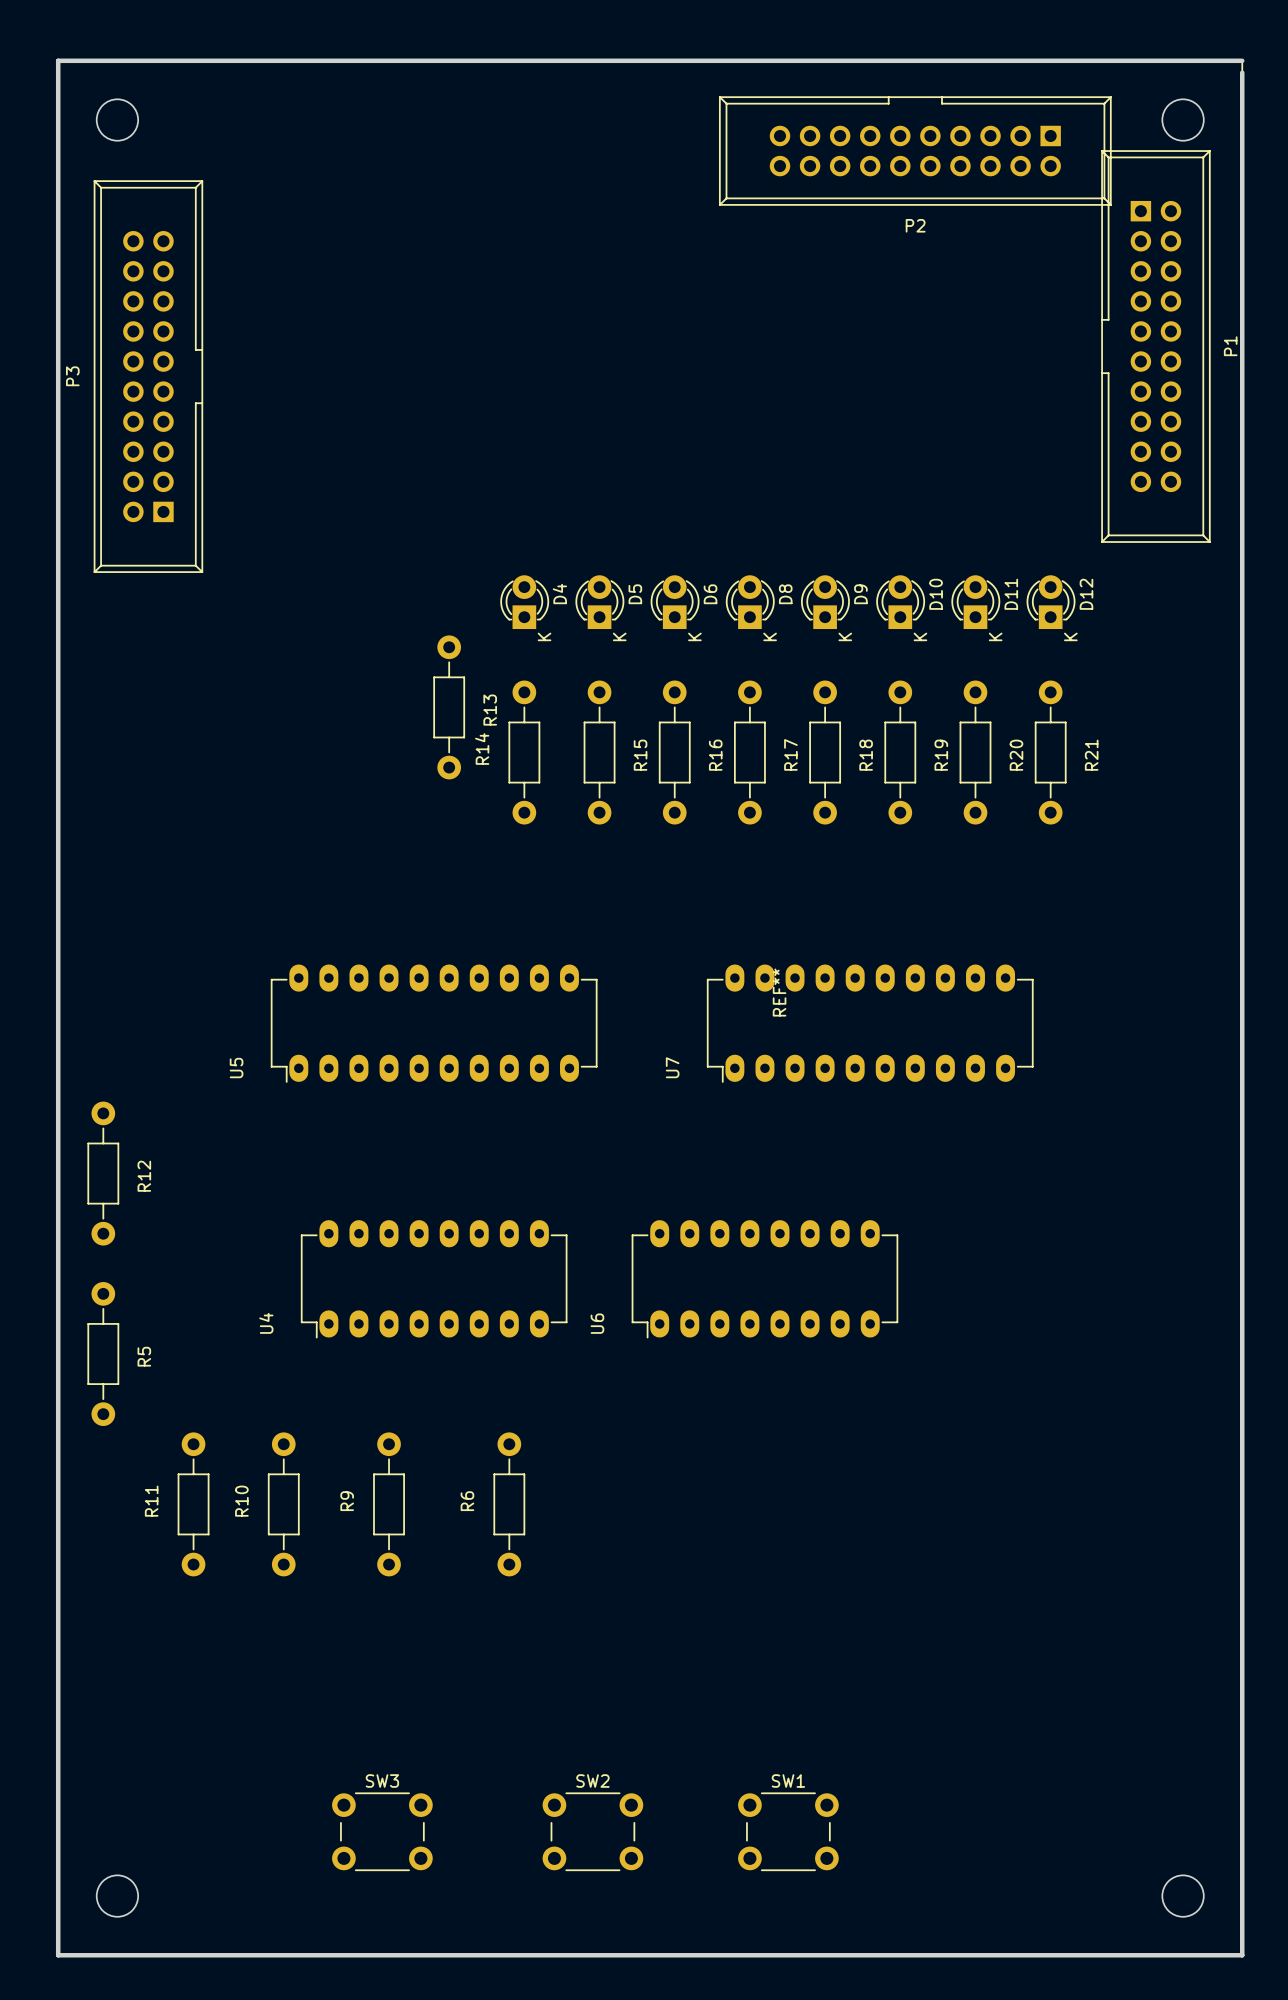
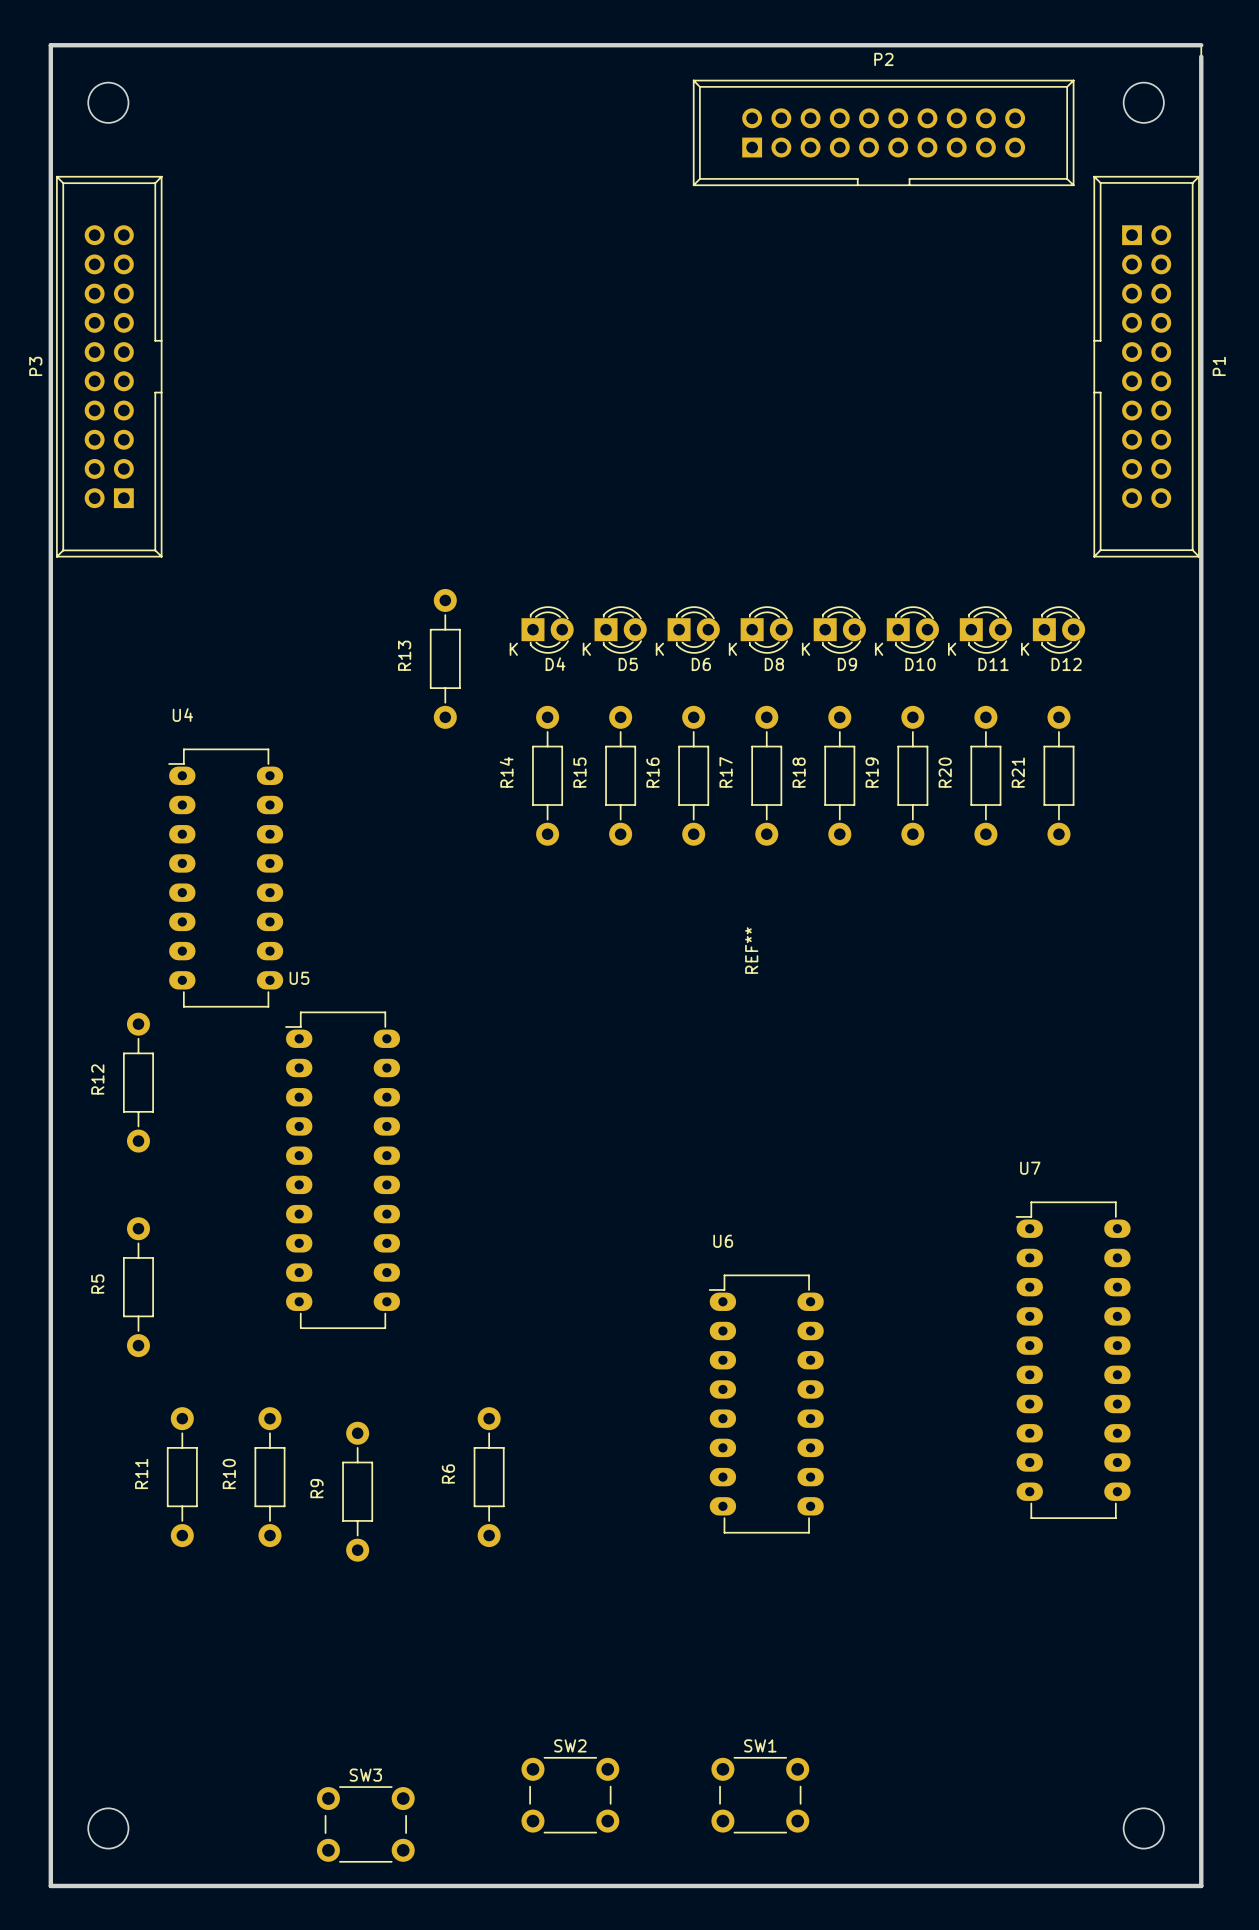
P2 rotation: 0° (915, 151) -> 180° (883, 132)
P1 position: (1155, 346) -> (1146, 366)
P3 position: (148, 376) -> (109, 366)
D4 rotation: 0° (524, 602) -> 90° clockwise (547, 630)
D4 position: (524, 602) -> (547, 630)
D5 rotation: 0° (599, 602) -> 90° clockwise (620, 630)
D5 position: (599, 602) -> (620, 630)
D6 rotation: 0° (675, 602) -> 90° clockwise (693, 630)
D6 position: (675, 602) -> (693, 630)
D8 rotation: 0° (750, 602) -> 90° clockwise (766, 630)
D8 position: (750, 602) -> (766, 630)
D9 rotation: 0° (825, 602) -> 90° clockwise (839, 630)
D9 position: (825, 602) -> (839, 630)
D10 rotation: 0° (900, 602) -> 90° clockwise (912, 630)
D10 position: (900, 602) -> (912, 630)
D11 rotation: 0° (975, 602) -> 90° clockwise (985, 630)
D11 position: (975, 602) -> (985, 630)
D12 rotation: 0° (1051, 602) -> 90° clockwise (1058, 630)
D12 position: (1051, 602) -> (1058, 630)
R13 position: (449, 707) -> (445, 658)
R13 name position: R13 (490, 710) -> R13 (404, 655)
R14 position: (524, 752) -> (547, 775)
R15 position: (599, 752) -> (620, 775)
R16 position: (674, 752) -> (693, 775)
R17 position: (749, 752) -> (766, 775)
R18 position: (825, 752) -> (839, 775)
R19 position: (900, 752) -> (912, 775)
R20 position: (975, 752) -> (985, 775)
R21 position: (1050, 752) -> (1058, 775)
R17 name position: R17 (790, 754) -> R17 (726, 772)
R15 name position: R15 (640, 755) -> R15 (579, 772)
R16 name position: R16 (715, 755) -> R16 (653, 772)
R18 name position: R18 (866, 755) -> R18 (799, 772)
R19 name position: R19 (941, 755) -> R19 (872, 772)
R20 name position: R20 (1016, 755) -> R20 (945, 772)
R21 name position: R21 (1091, 755) -> R21 (1018, 772)
REF** position: (650, 1008) -> (626, 965)
U5 rotation: 0° (434, 1023) -> 90° clockwise (342, 1170)
U7 rotation: 0° (870, 1023) -> 90° clockwise (1073, 1360)
U7 position: (870, 1023) -> (1073, 1360)
R12 position: (103, 1173) -> (138, 1082)
R12 name position: R12 (144, 1176) -> R12 (97, 1079)
U4 rotation: 0° (434, 1279) -> 90° clockwise (225, 878)
U4 position: (434, 1279) -> (225, 878)
U6 rotation: 0° (764, 1279) -> 90° clockwise (766, 1404)
R5 position: (103, 1354) -> (138, 1287)
R5 name position: R5 (144, 1356) -> R5 (97, 1284)
R9 position: (389, 1504) -> (357, 1491)
SW3 position: (382, 1831) -> (365, 1824)

